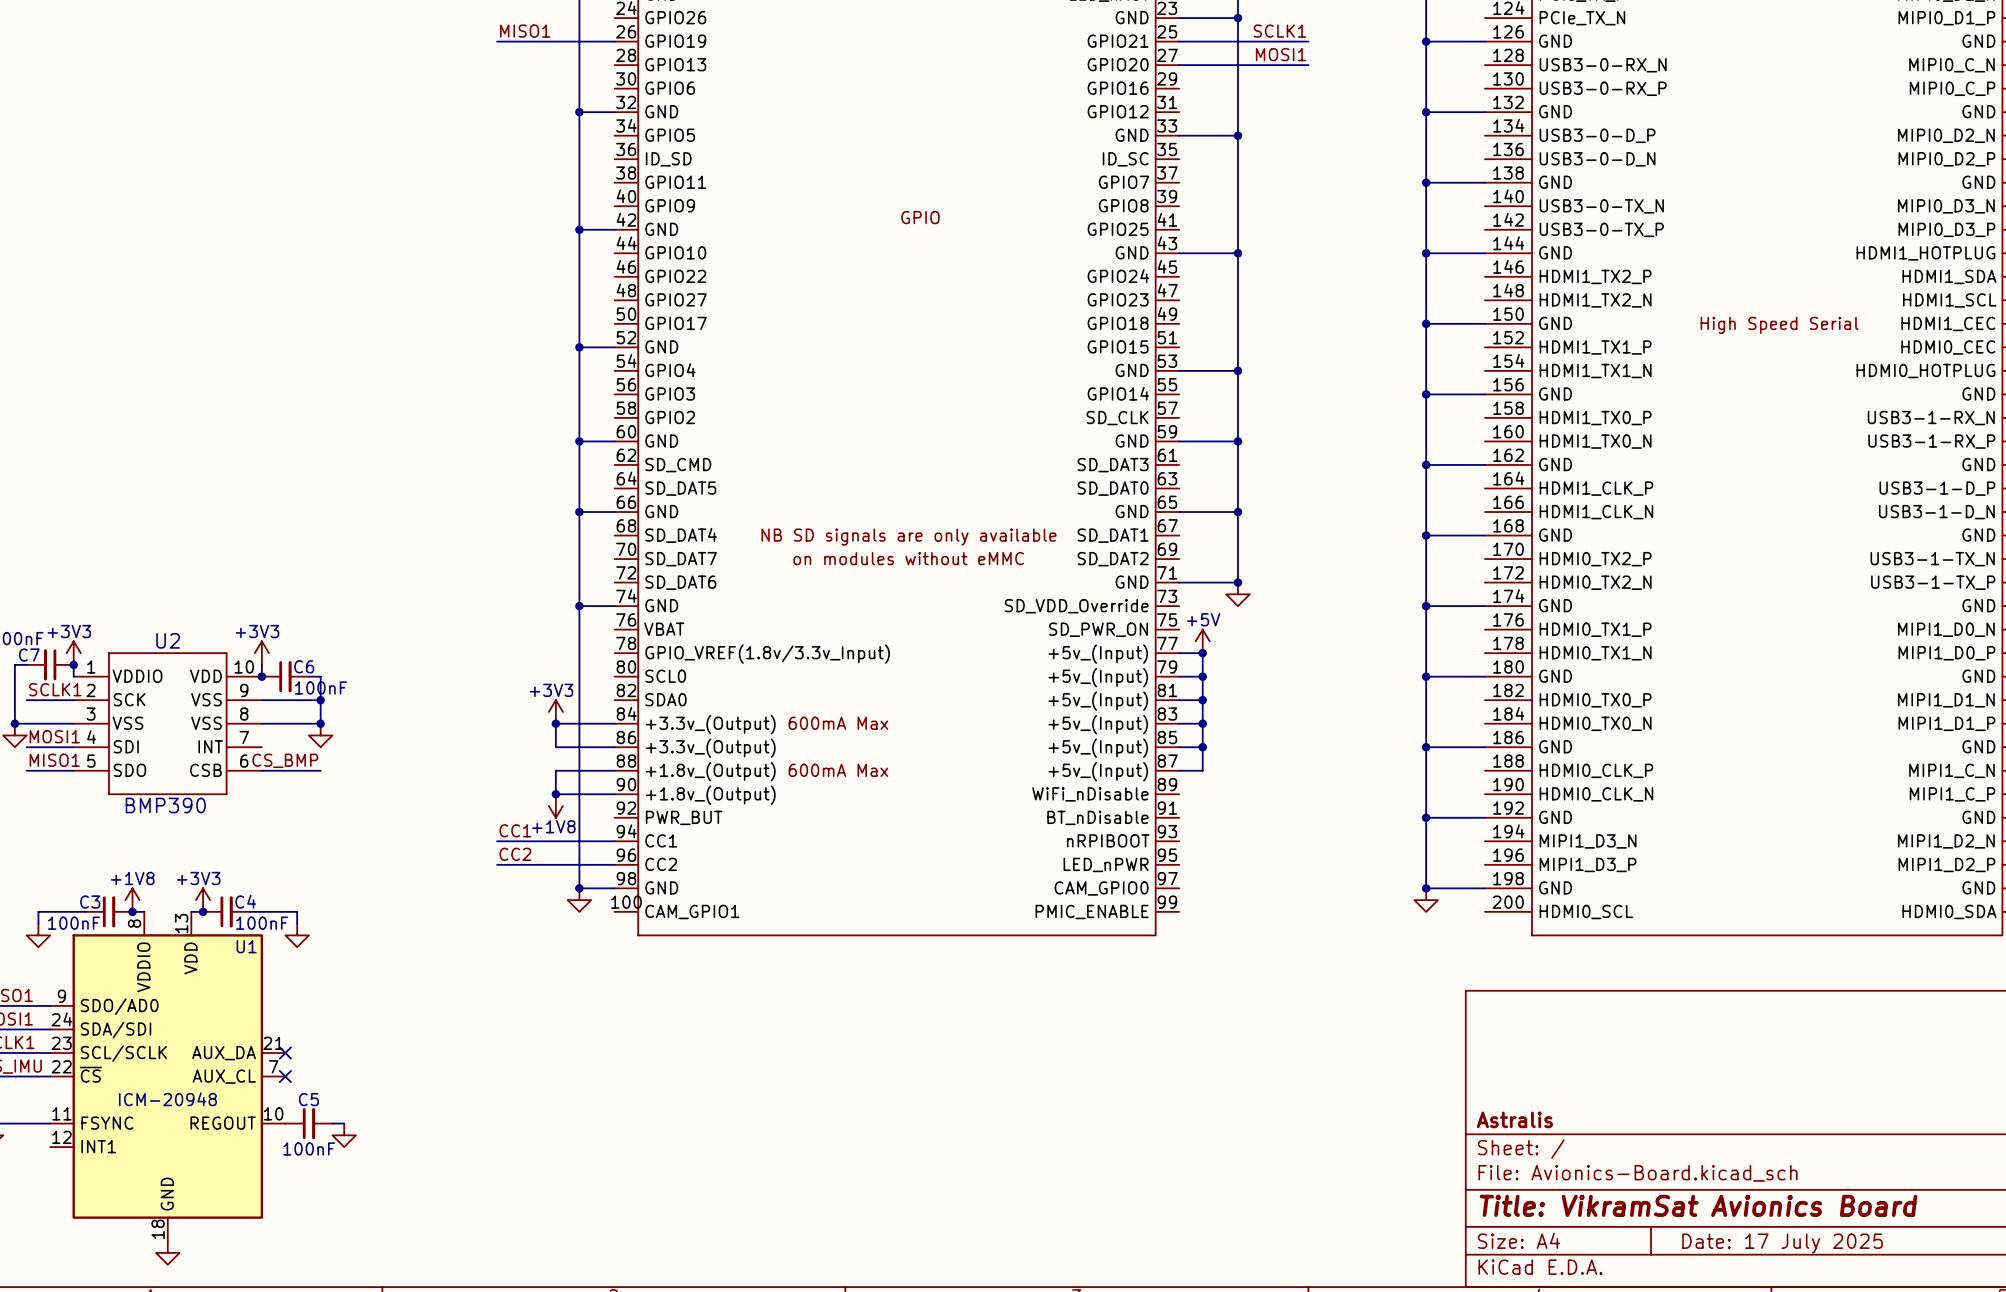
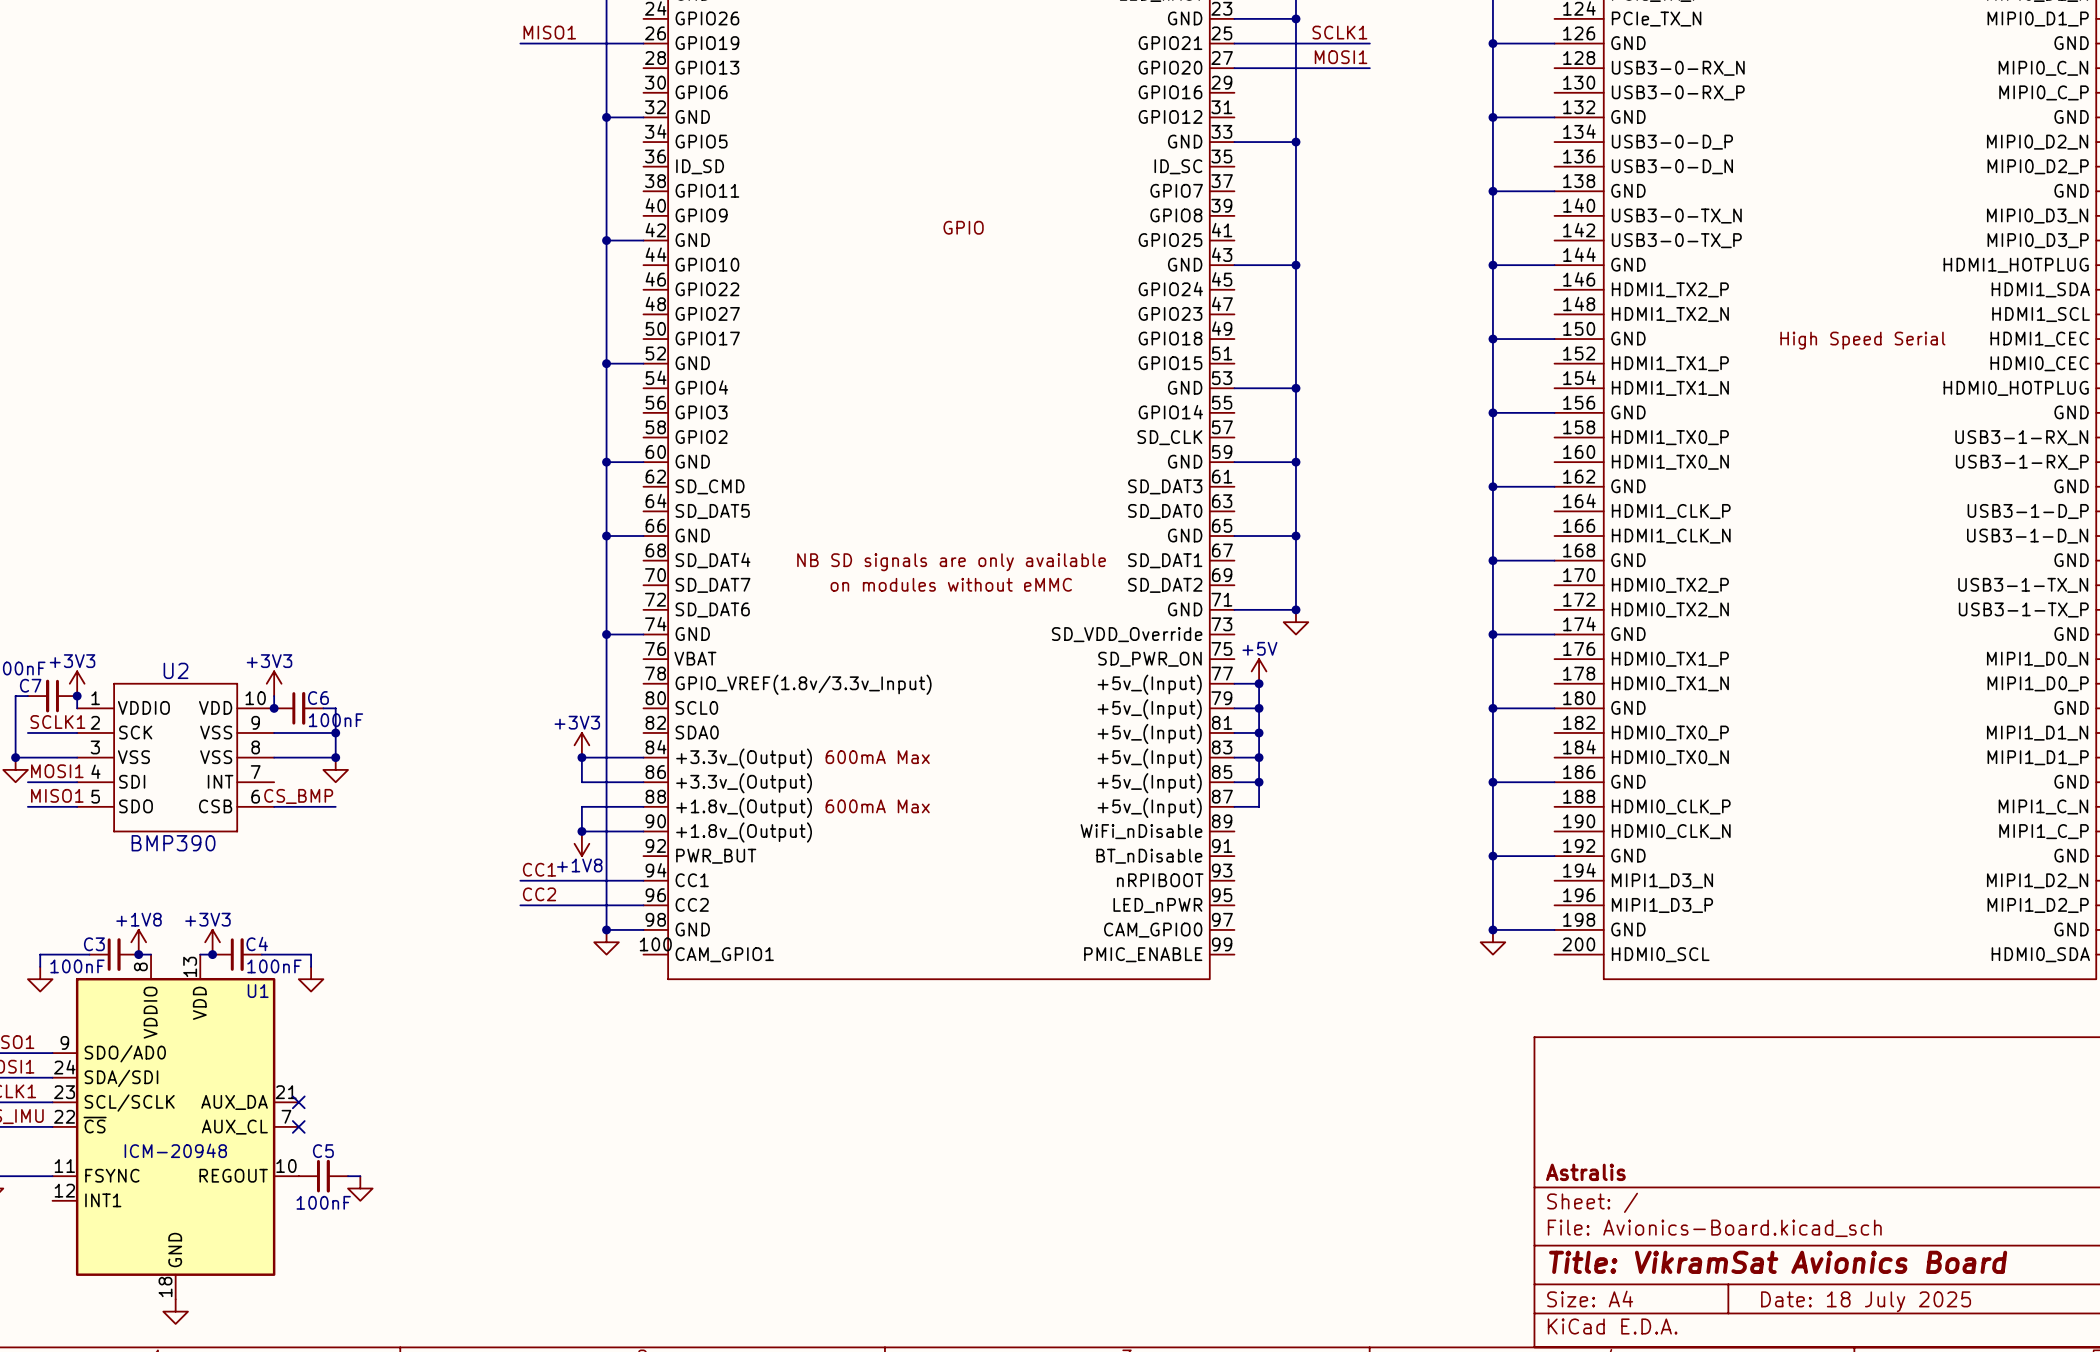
title block: Date: 17 July 2025 (1782, 1243) -> Date: 18 July 2025 (1866, 1301)

